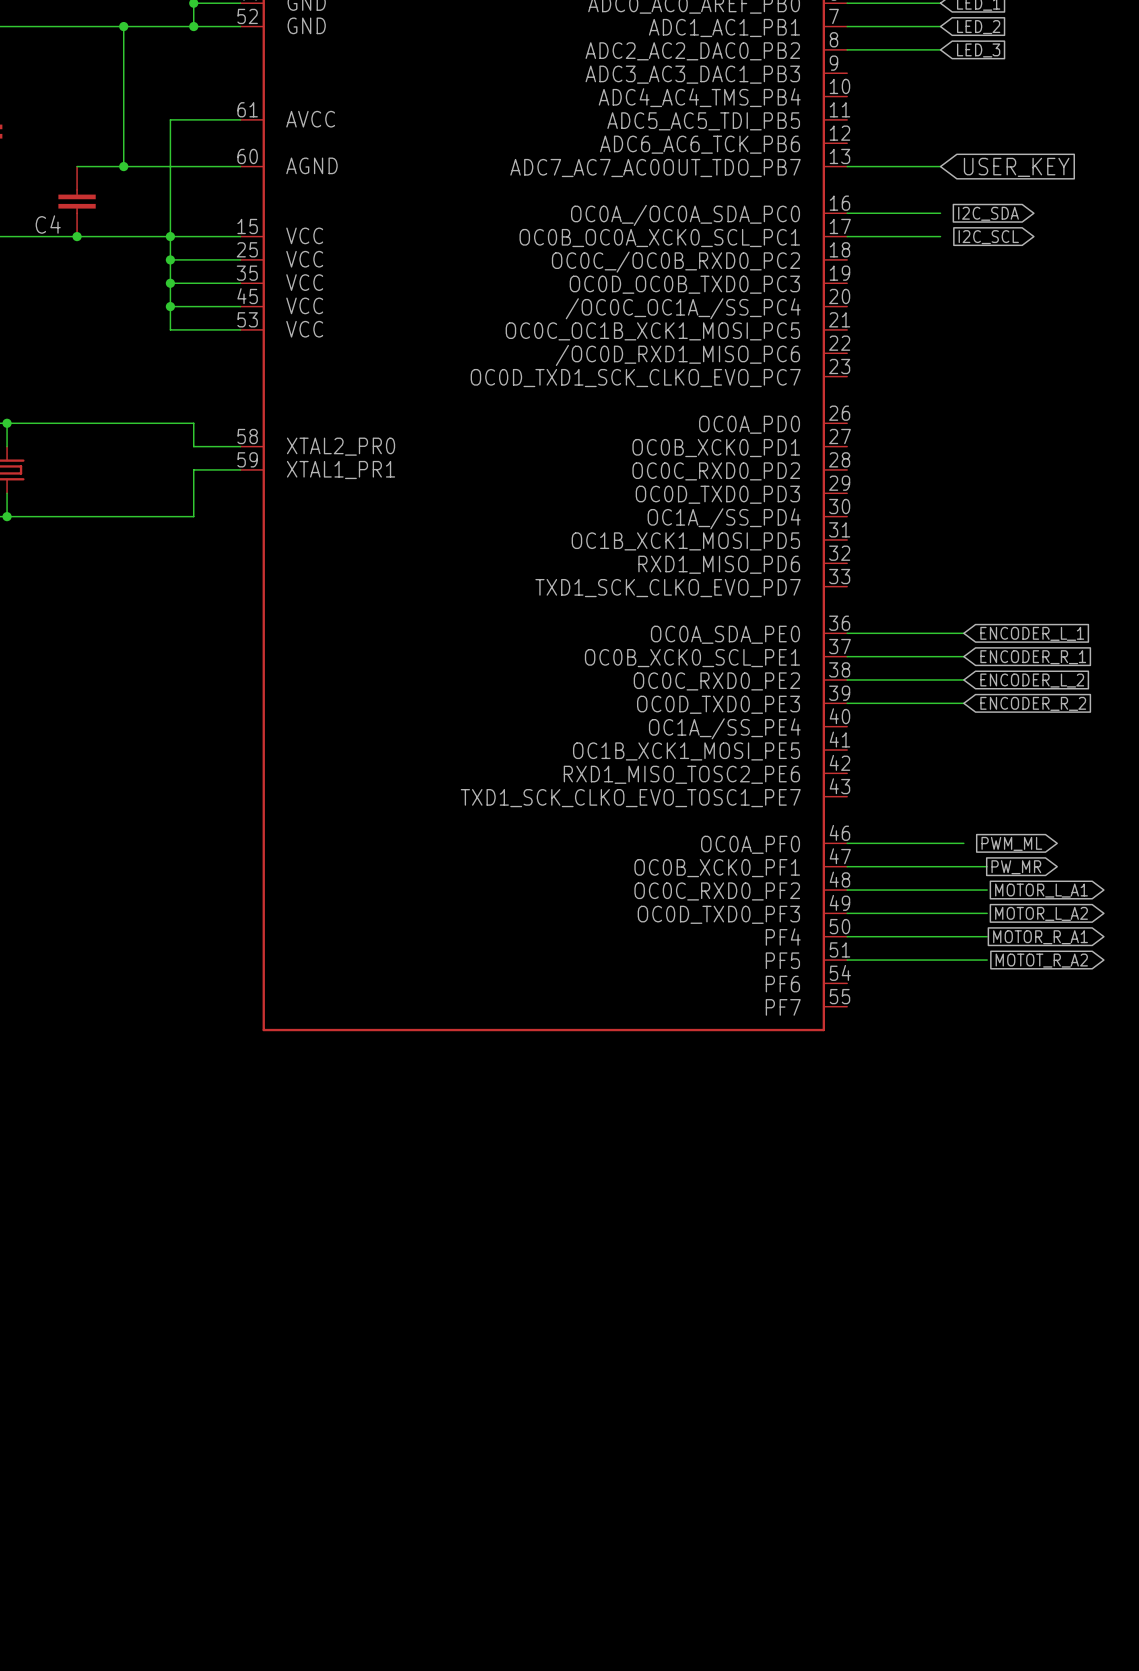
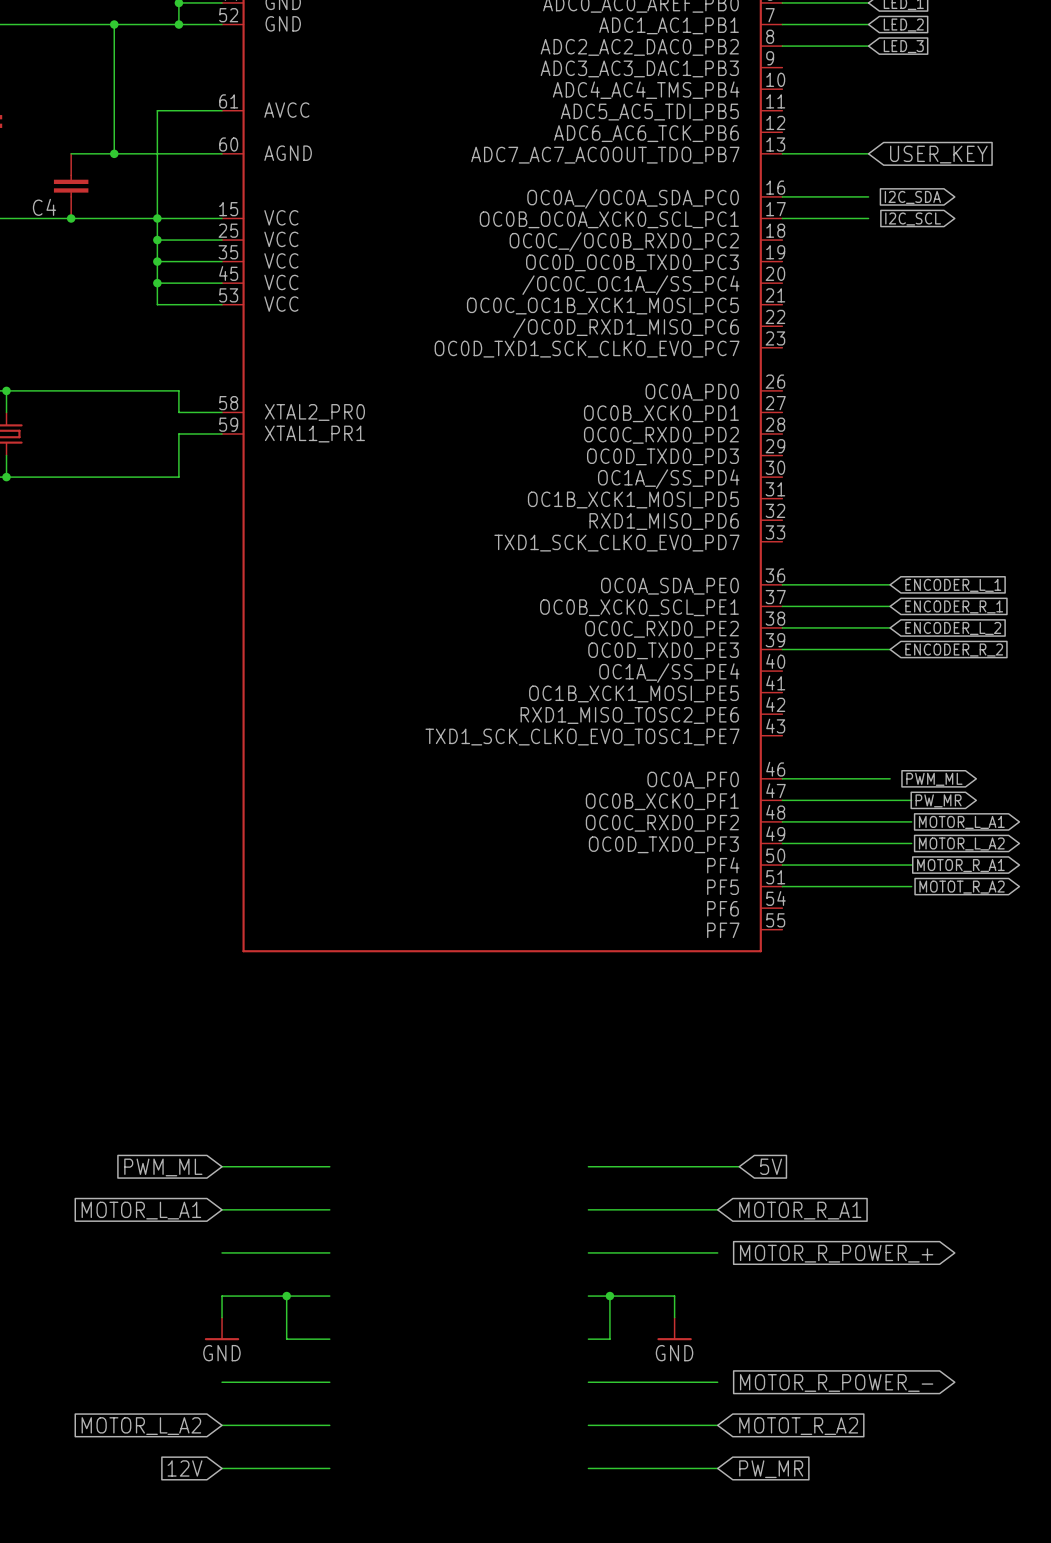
wire: none -> (222, 1166) (329, 1166)
wire: none -> (588, 1166) (739, 1166)
global label: none -> 5V (771, 1166)
global label: none -> PWM_ML (163, 1167)
global label: none -> MOTOR_L_A1 (141, 1210)
wire: none -> (222, 1209) (329, 1209)
wire: none -> (588, 1209) (717, 1209)
global label: none -> MOTOR_R_A1 (800, 1210)
wire: none -> (222, 1252) (329, 1252)
wire: none -> (588, 1252) (717, 1252)
global label: none -> MOTOR_R_POWER_+ (836, 1253)
wire: none -> (286, 1296) (286, 1339) (329, 1339)
junction: none -> (286, 1296)
wire: none -> (329, 1296) (222, 1296) (222, 1317)
wire: none -> (588, 1296) (674, 1296) (674, 1317)
wire: none -> (609, 1296) (609, 1339) (588, 1339)
junction: none -> (609, 1296)
power symbol: none -> GND (222, 1328)
power symbol: none -> GND (674, 1328)
wire: none -> (222, 1382) (329, 1382)
wire: none -> (588, 1382) (717, 1382)
global label: none -> MOTOR_R_POWER_- (836, 1382)
wire: none -> (222, 1425) (329, 1425)
wire: none -> (588, 1425) (717, 1425)
global label: none -> MOTOR_L_A2 (141, 1426)
global label: none -> MOTOT_R_A2 (798, 1426)
global label: none -> 12V (185, 1468)
wire: none -> (222, 1468) (329, 1468)
wire: none -> (588, 1468) (717, 1468)
global label: none -> PW_MR (771, 1469)

